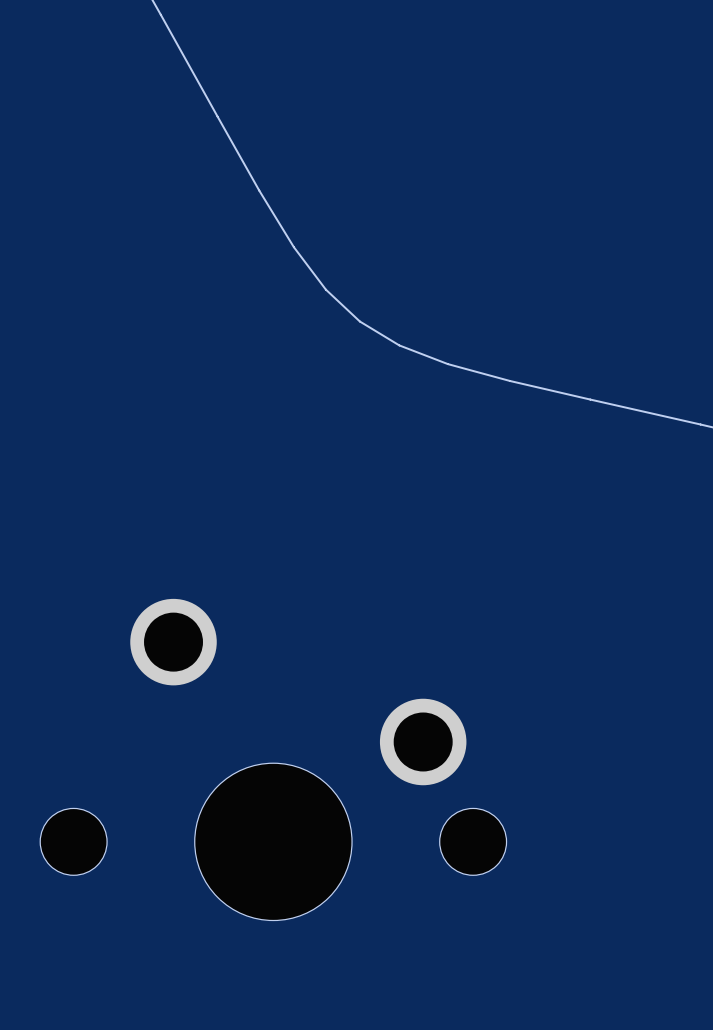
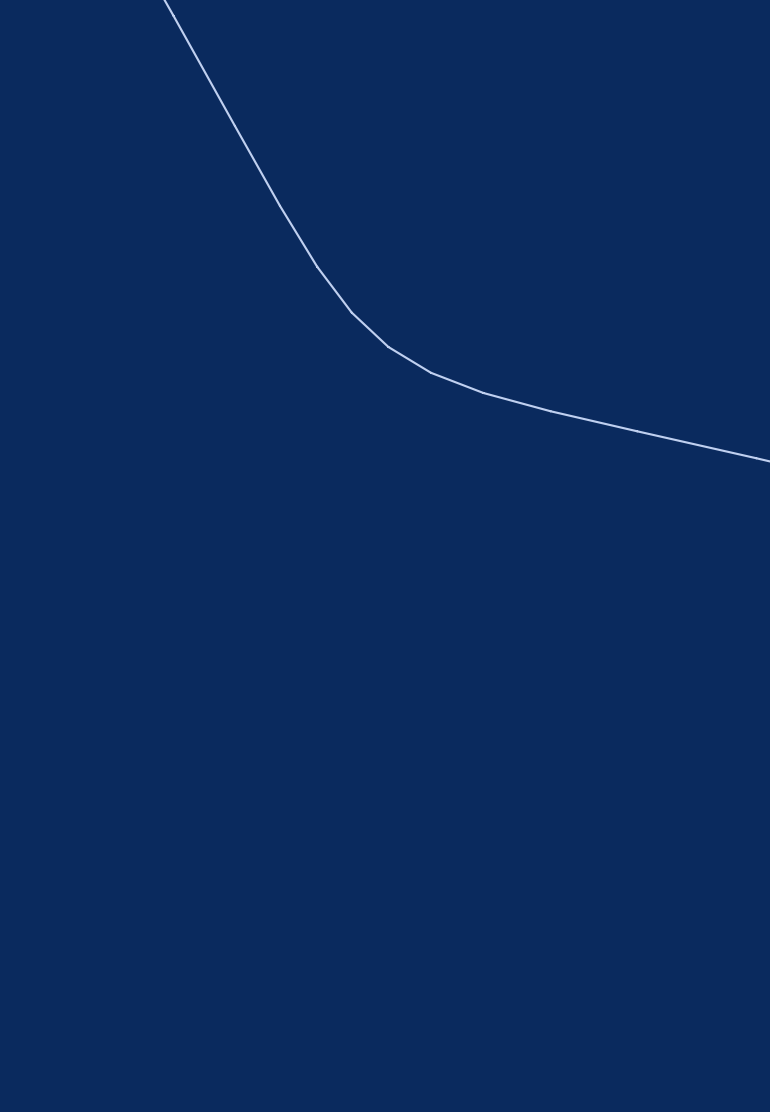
part: (273, 759) -> none

